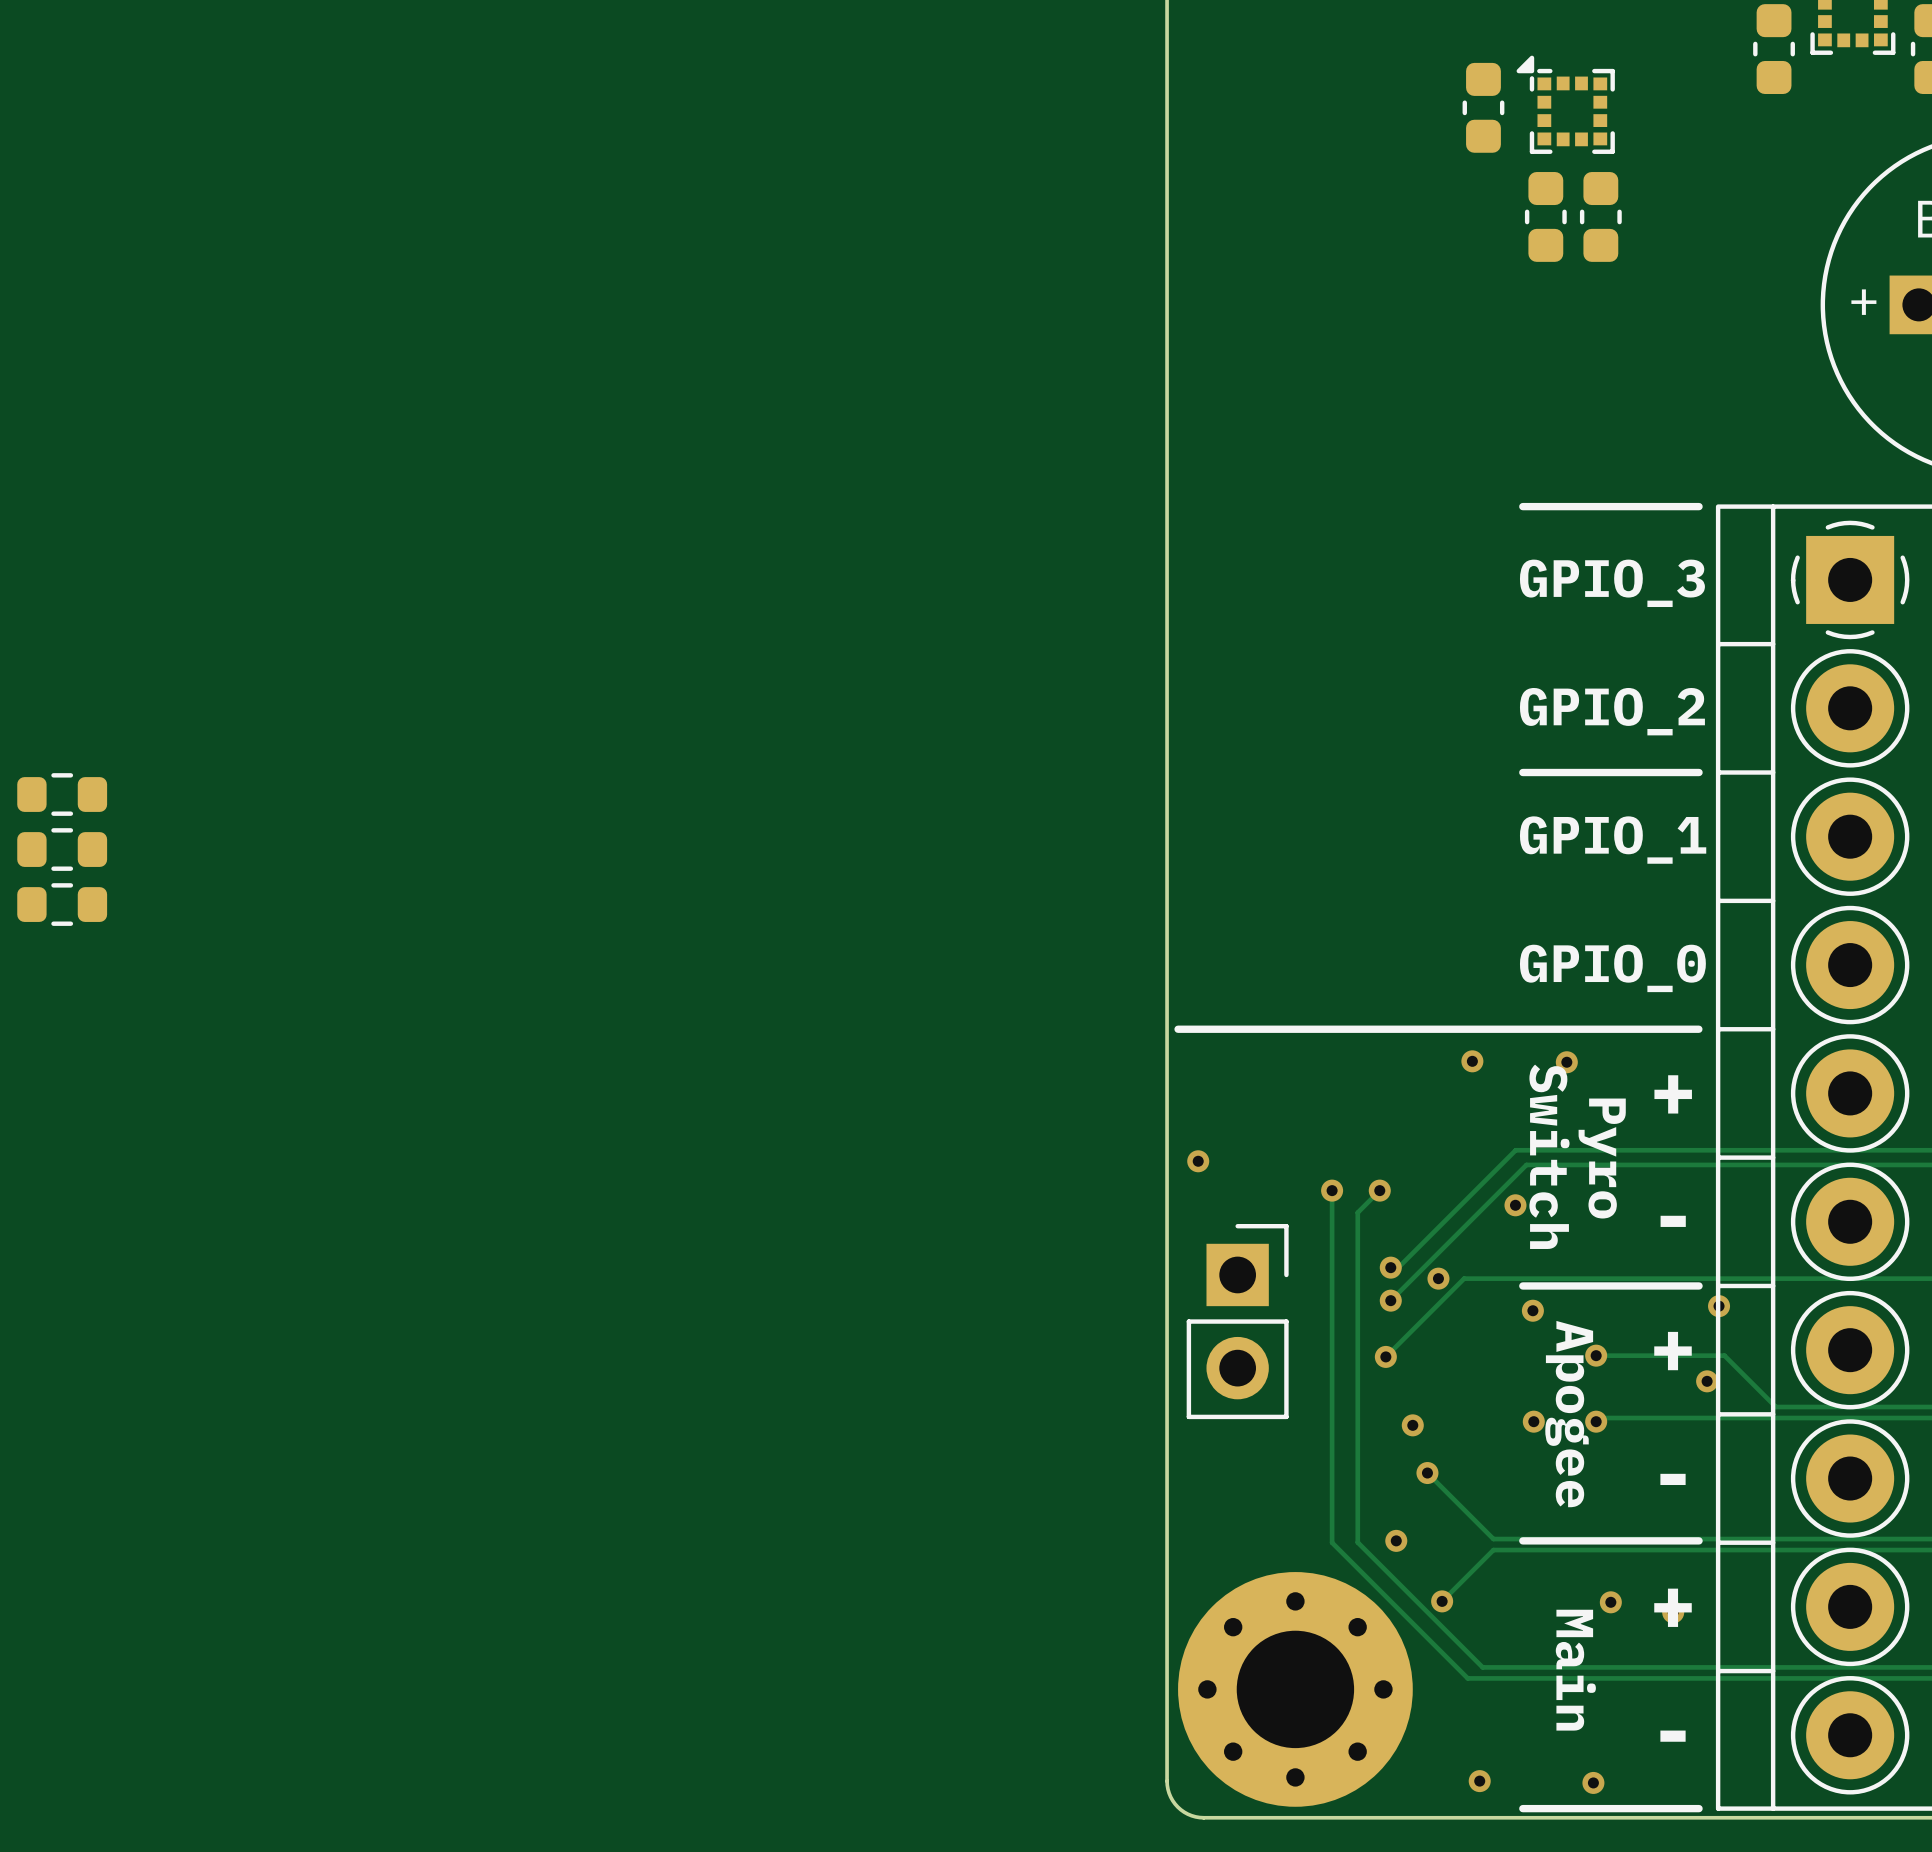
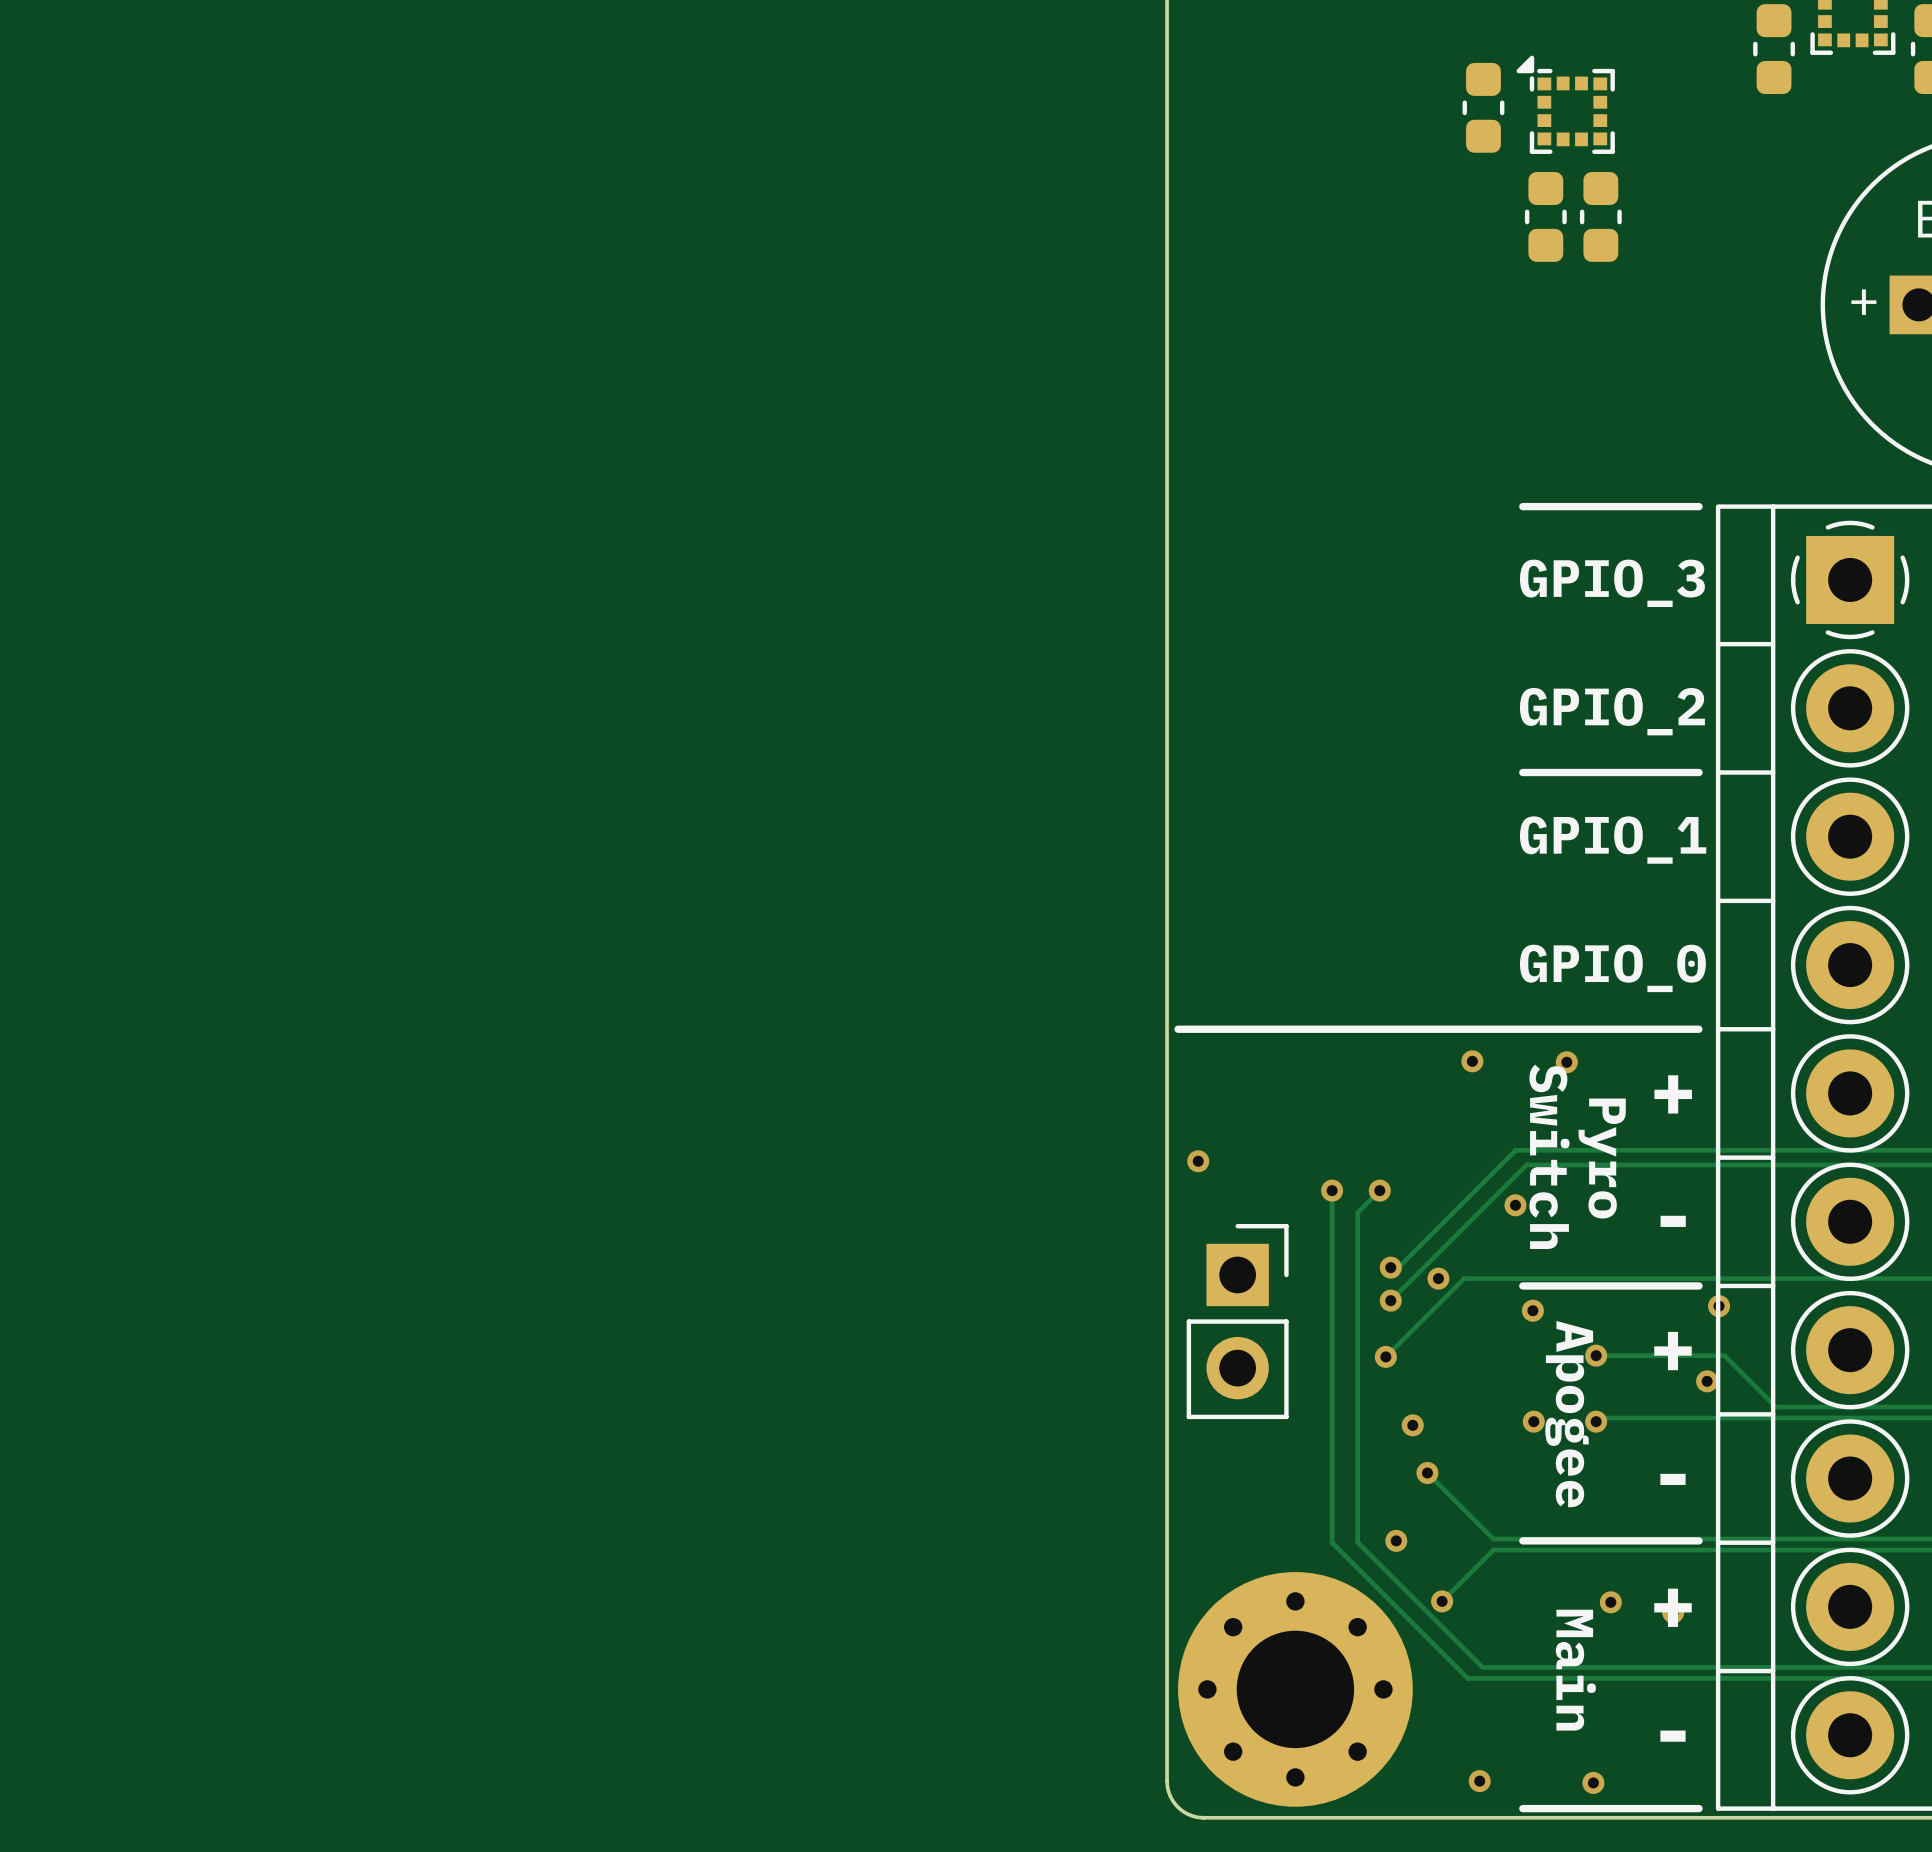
part: (62, 794) -> none
part: (62, 849) -> none
part: (62, 904) -> none

